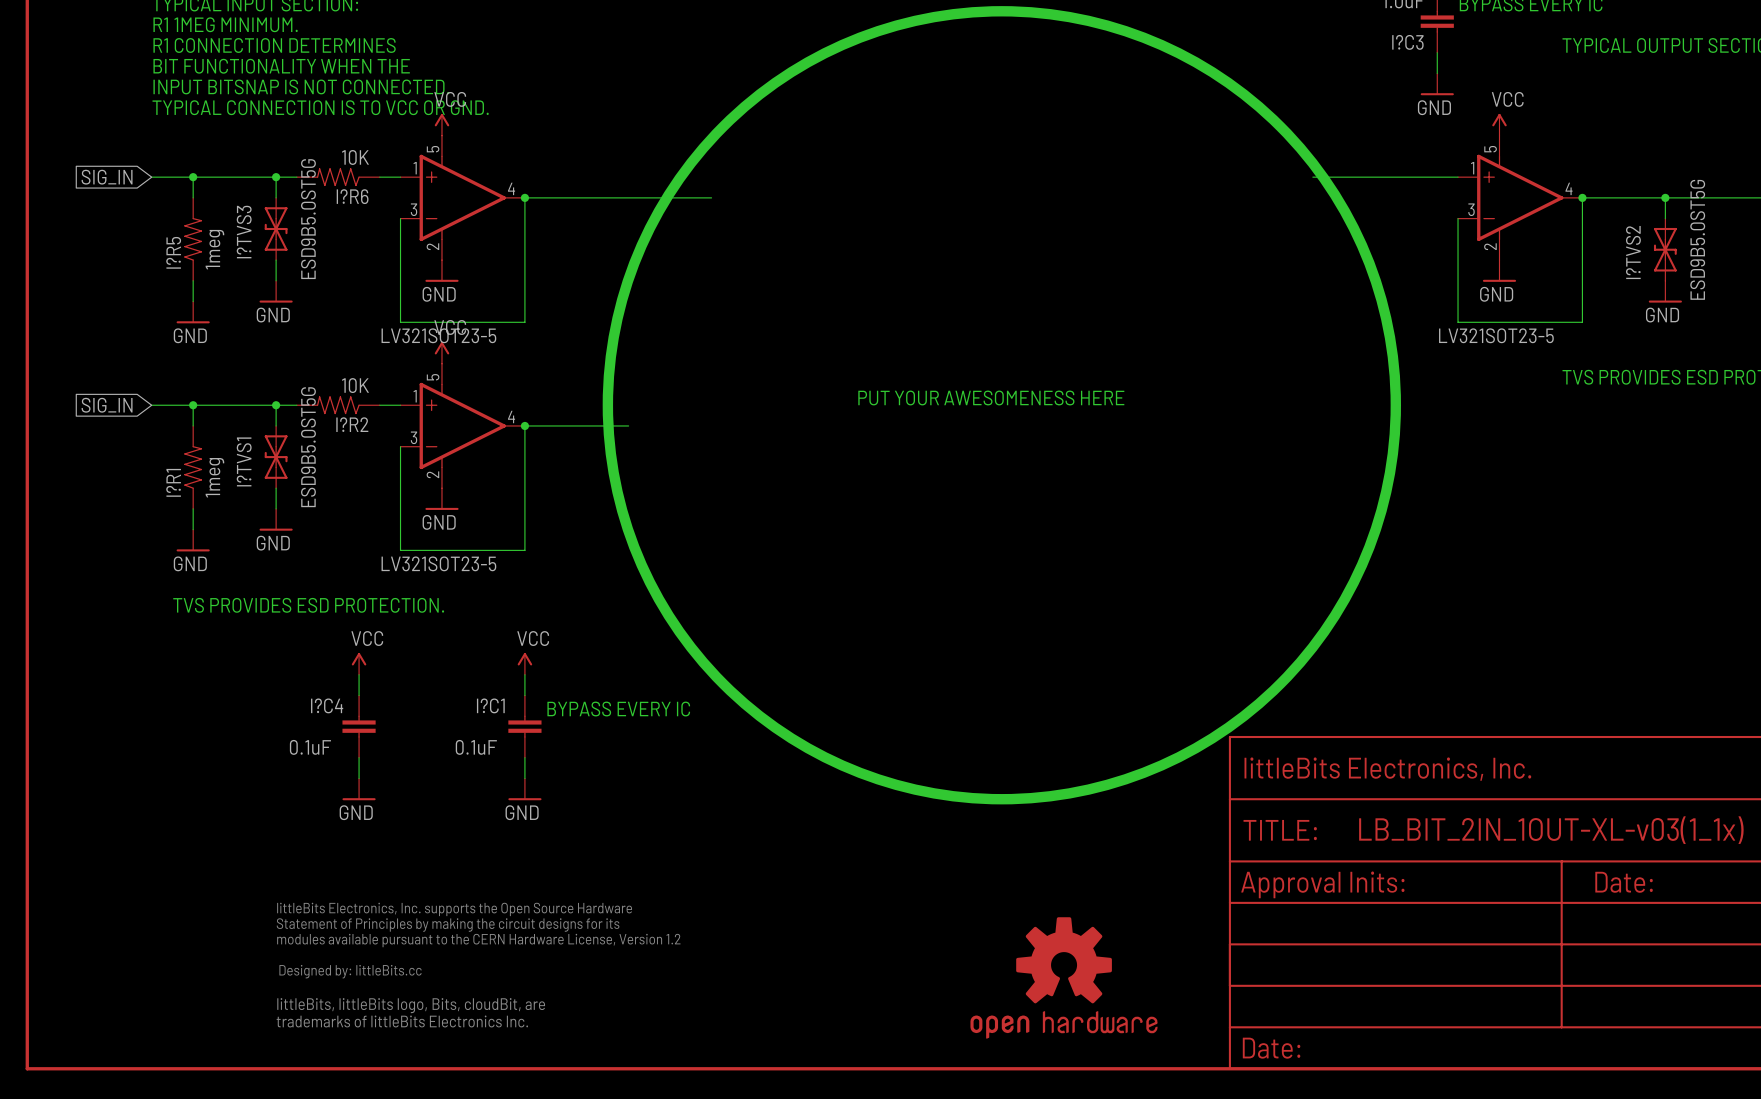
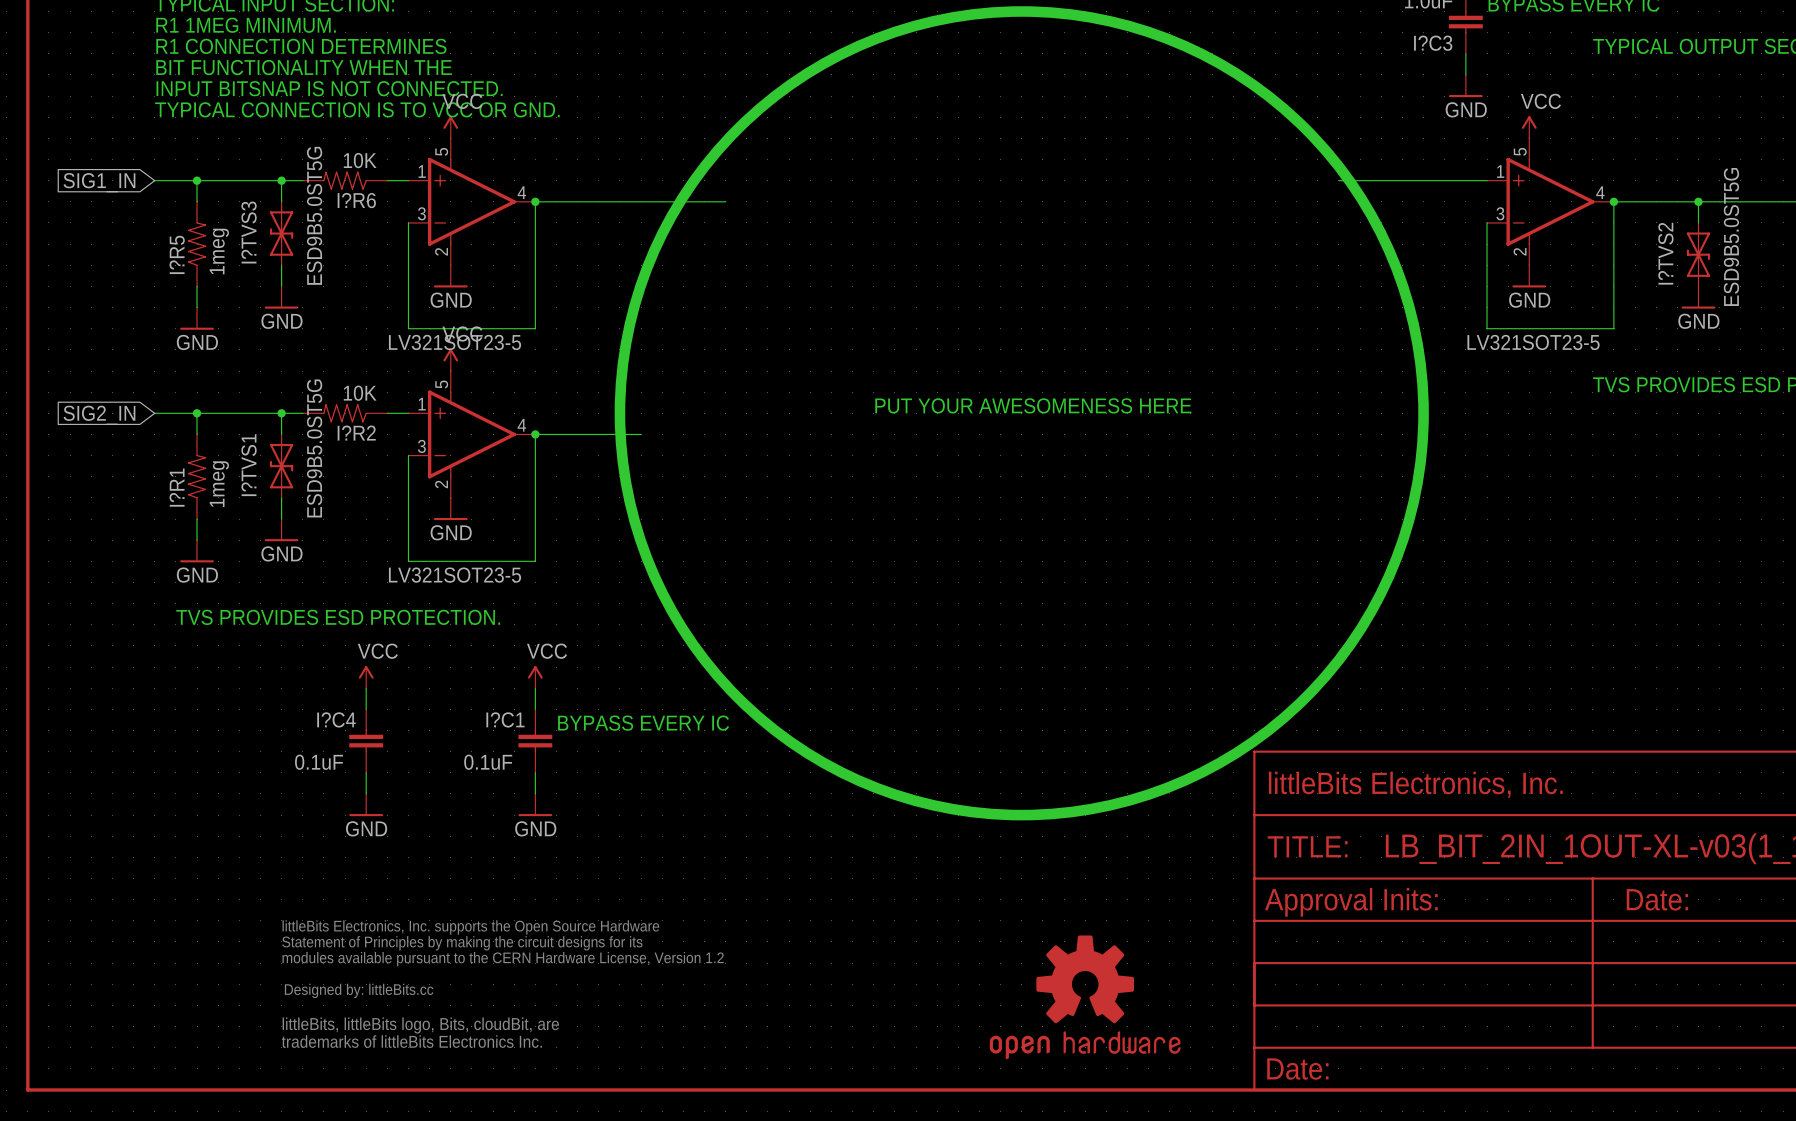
global label: SIG_IN (107, 177) -> SIG1_IN (99, 182)
global label: SIG_IN (107, 405) -> SIG2_IN (99, 415)

